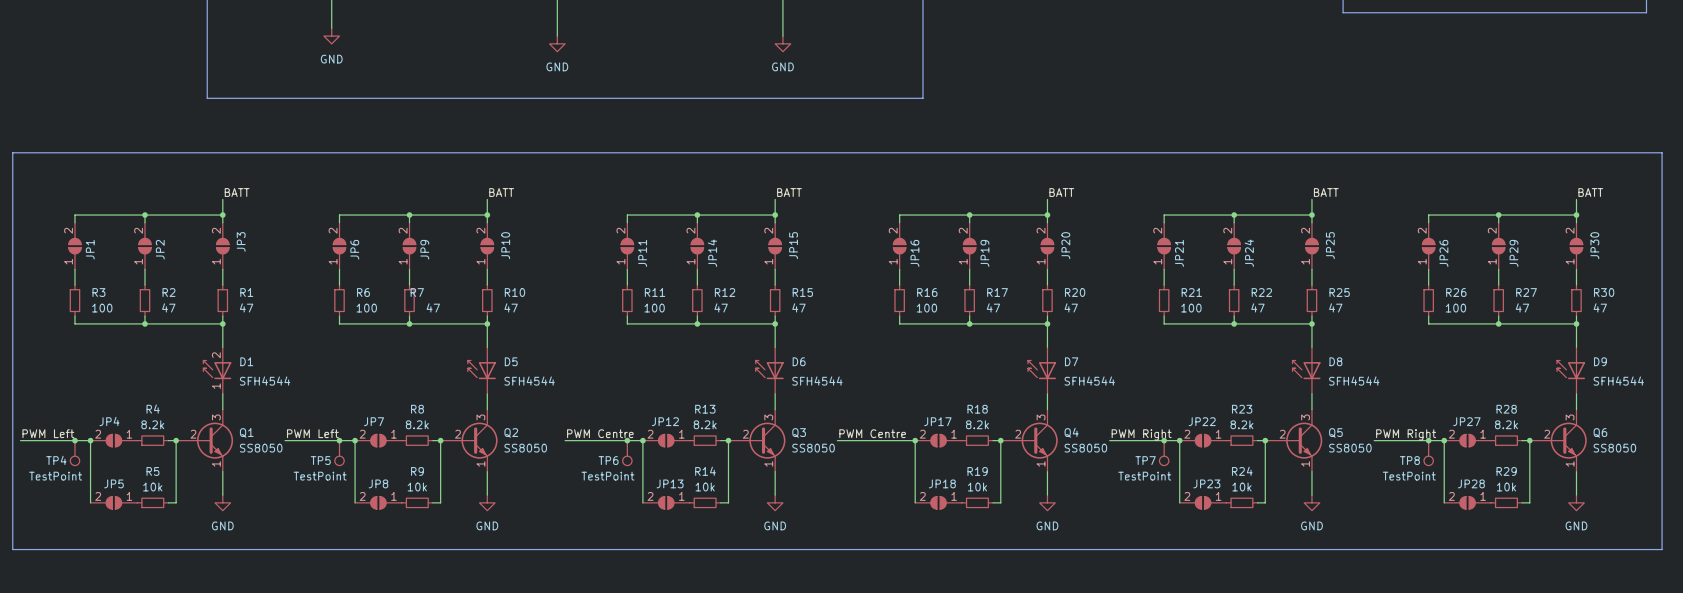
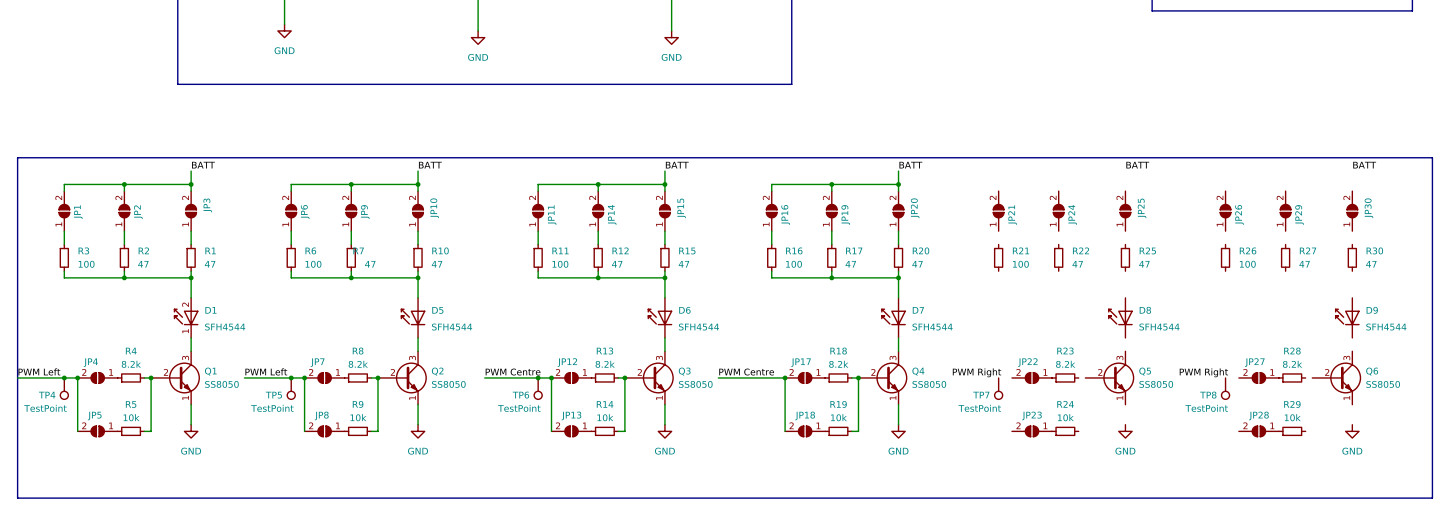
line: (12, 152) (1662, 152) (1662, 549) (12, 549) (12, 152) -> (17, 157) (1432, 157) (1432, 498) (17, 498) (17, 157)
wire: (1311, 199) (1311, 222) -> none
wire: (1576, 199) (1576, 222) -> none
wire: (1234, 215) (1234, 222) -> none
junction: (1234, 215) -> none
wire: (1311, 215) (1164, 215) (1164, 222) -> none
junction: (1311, 215) -> none
wire: (1498, 215) (1498, 222) -> none
junction: (1498, 215) -> none
wire: (1576, 215) (1428, 215) (1428, 222) -> none
junction: (1576, 215) -> none
wire: (1164, 269) (1164, 285) -> none
wire: (1234, 269) (1234, 285) -> none
wire: (1311, 269) (1311, 285) -> none
wire: (1428, 269) (1428, 285) -> none
wire: (1498, 269) (1498, 285) -> none
wire: (1576, 269) (1576, 285) -> none
wire: (1164, 316) (1164, 323) (1311, 323) -> none
wire: (1234, 316) (1234, 323) -> none
wire: (1311, 316) (1311, 347) -> none
wire: (1428, 316) (1428, 323) (1576, 323) -> none
wire: (1498, 316) (1498, 323) -> none
wire: (1576, 316) (1576, 347) -> none
junction: (1234, 323) -> none
junction: (1311, 323) -> none
junction: (1498, 323) -> none
junction: (1576, 323) -> none
wire: (1311, 393) (1311, 409) -> none
wire: (1576, 393) (1576, 409) -> none
wire: (1109, 440) (1179, 440) (1179, 502) -> none
junction: (1164, 440) -> none
junction: (1179, 440) -> none
wire: (1257, 440) (1265, 440) (1265, 502) (1257, 502) -> none
junction: (1265, 440) -> none
wire: (1374, 440) (1444, 440) (1444, 502) -> none
junction: (1428, 440) -> none
junction: (1444, 440) -> none
wire: (1522, 440) (1529, 440) (1529, 502) (1522, 502) -> none
junction: (1529, 440) -> none
wire: (1311, 471) (1311, 495) -> none
wire: (1576, 471) (1576, 495) -> none

